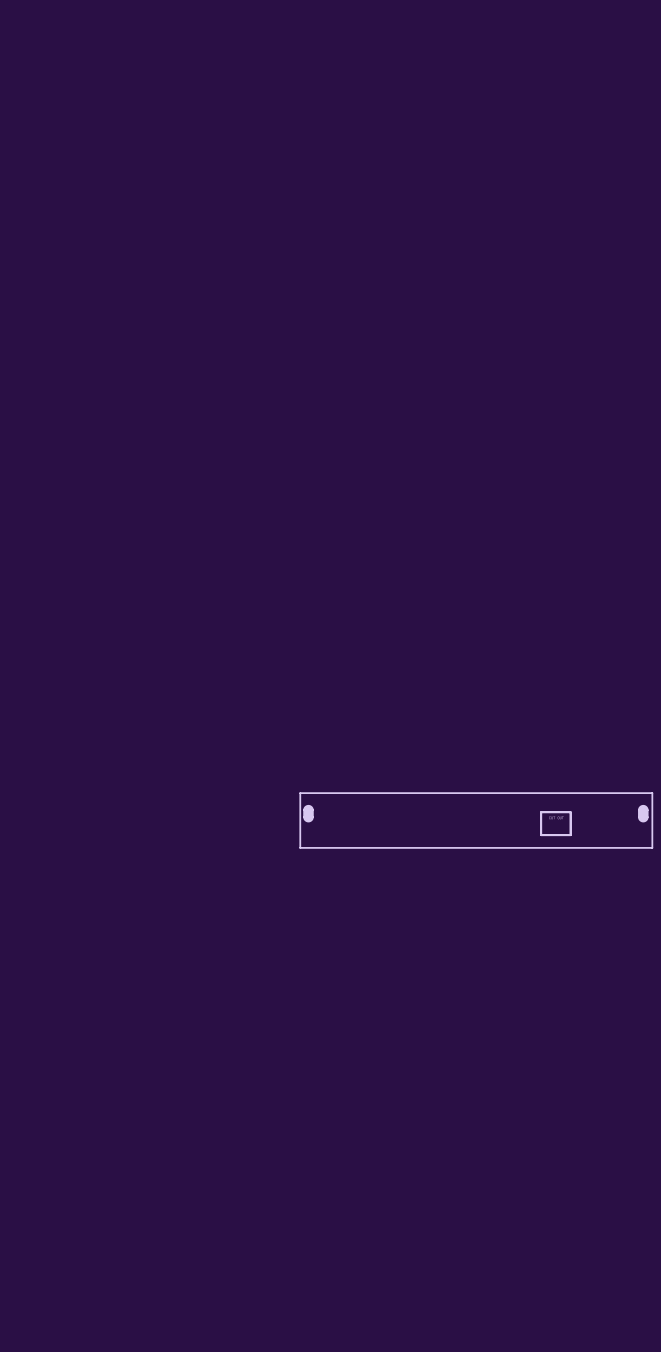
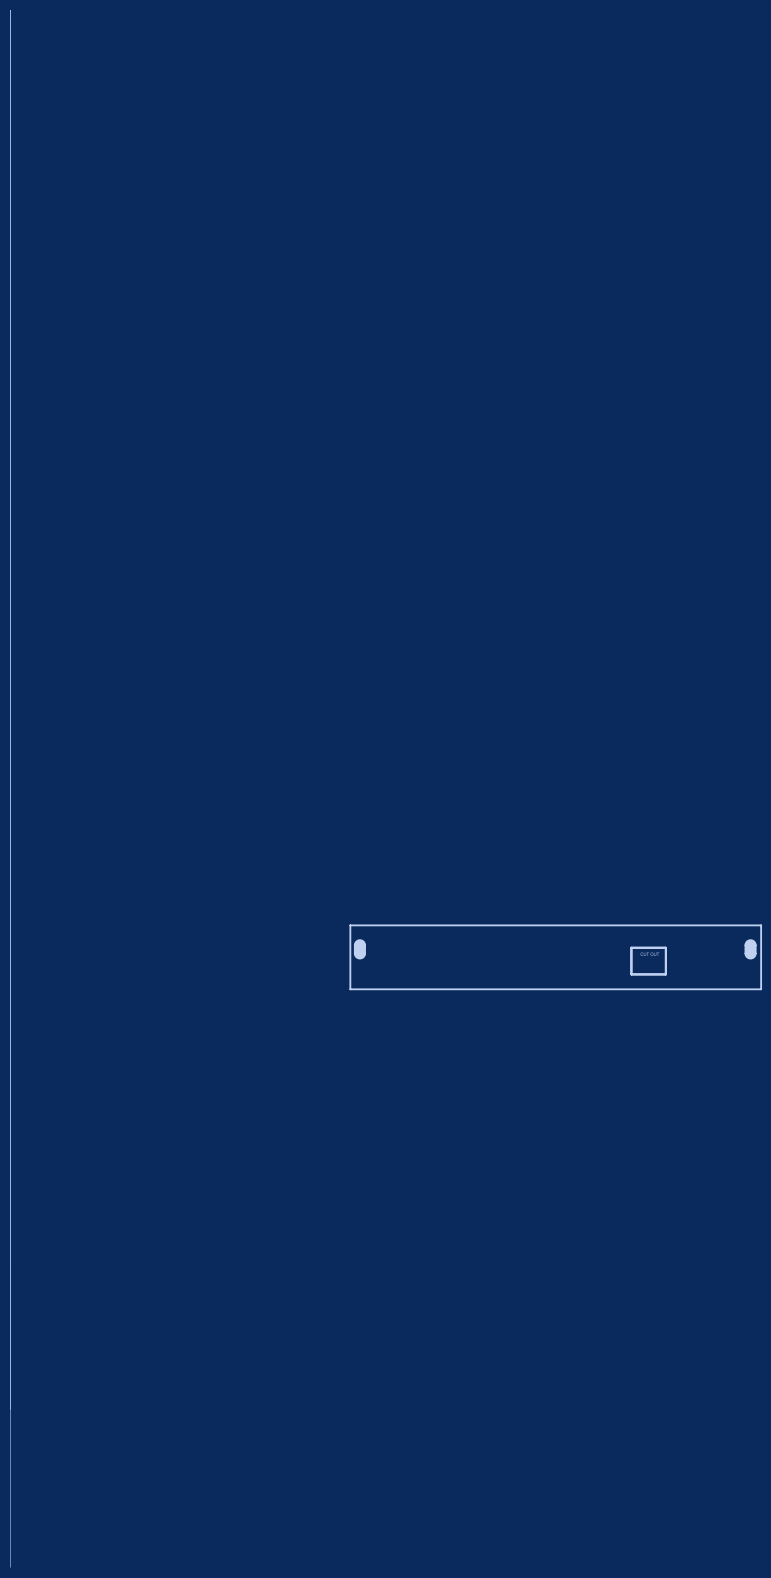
drawing: none -> [10, 10, 11, 1568]

